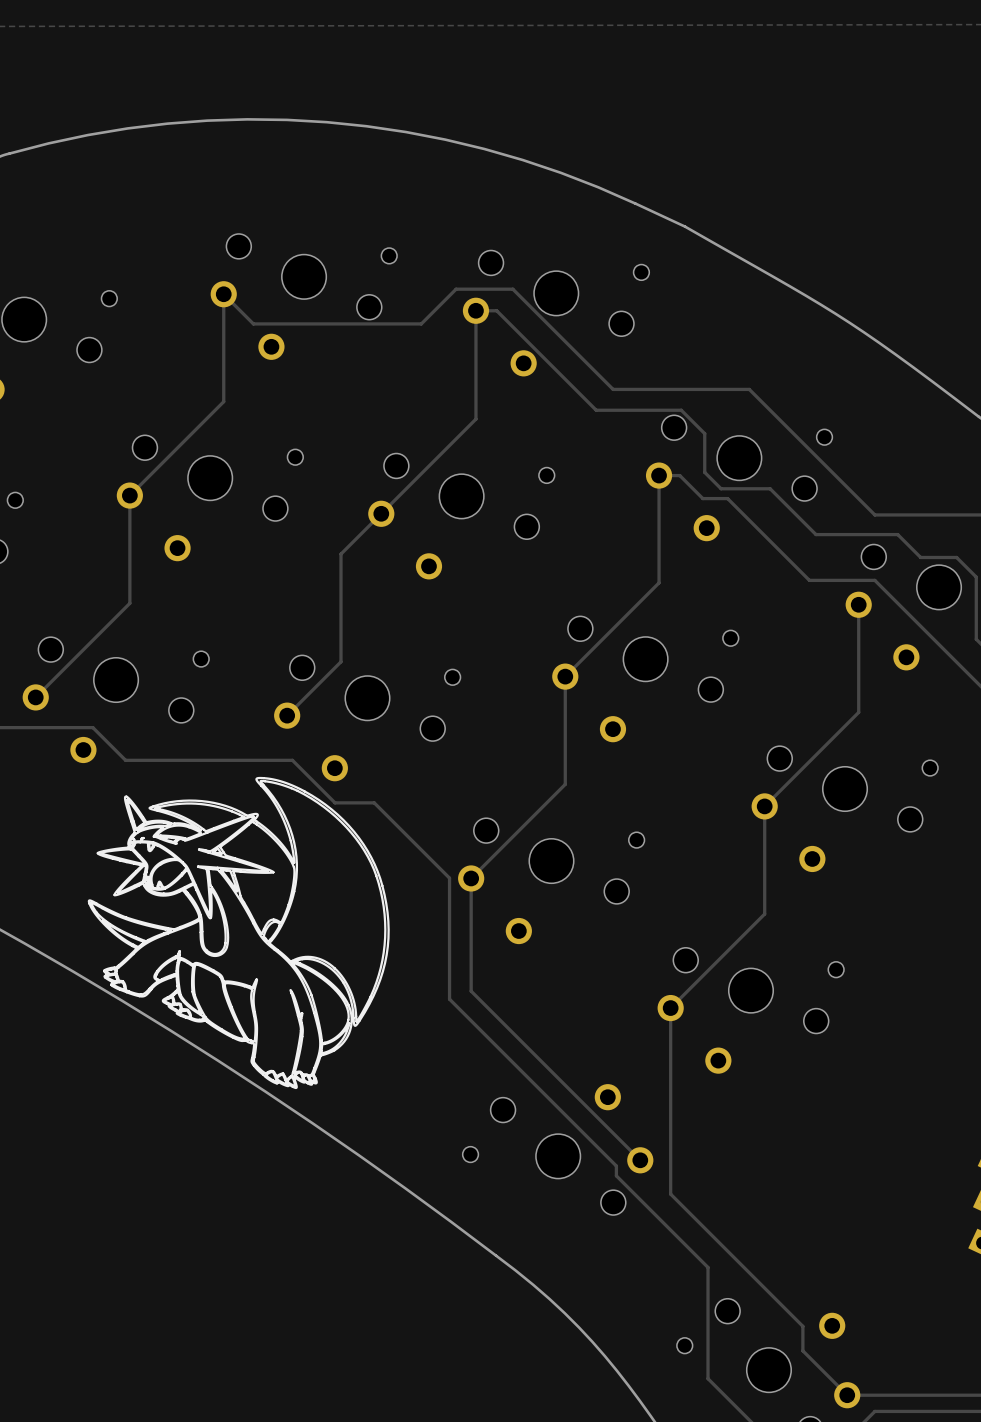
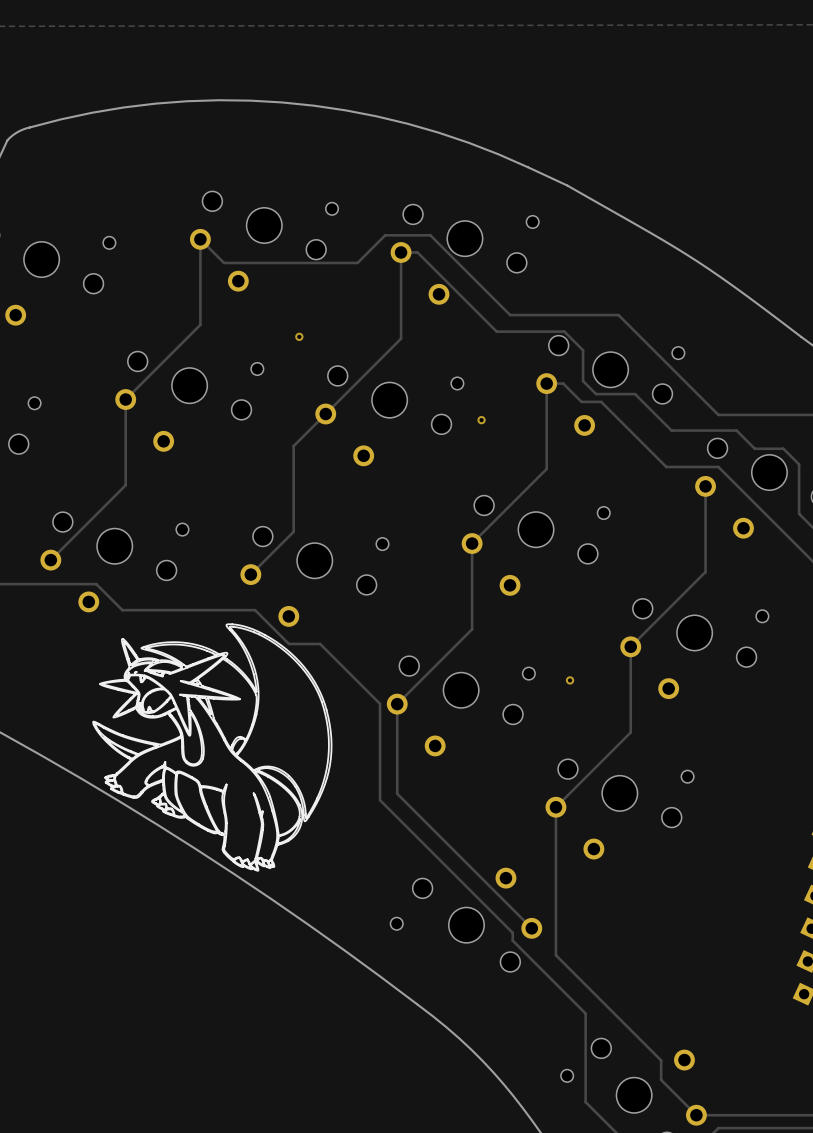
via: none -> (299, 336)
via: none -> (481, 420)
via: none -> (570, 680)

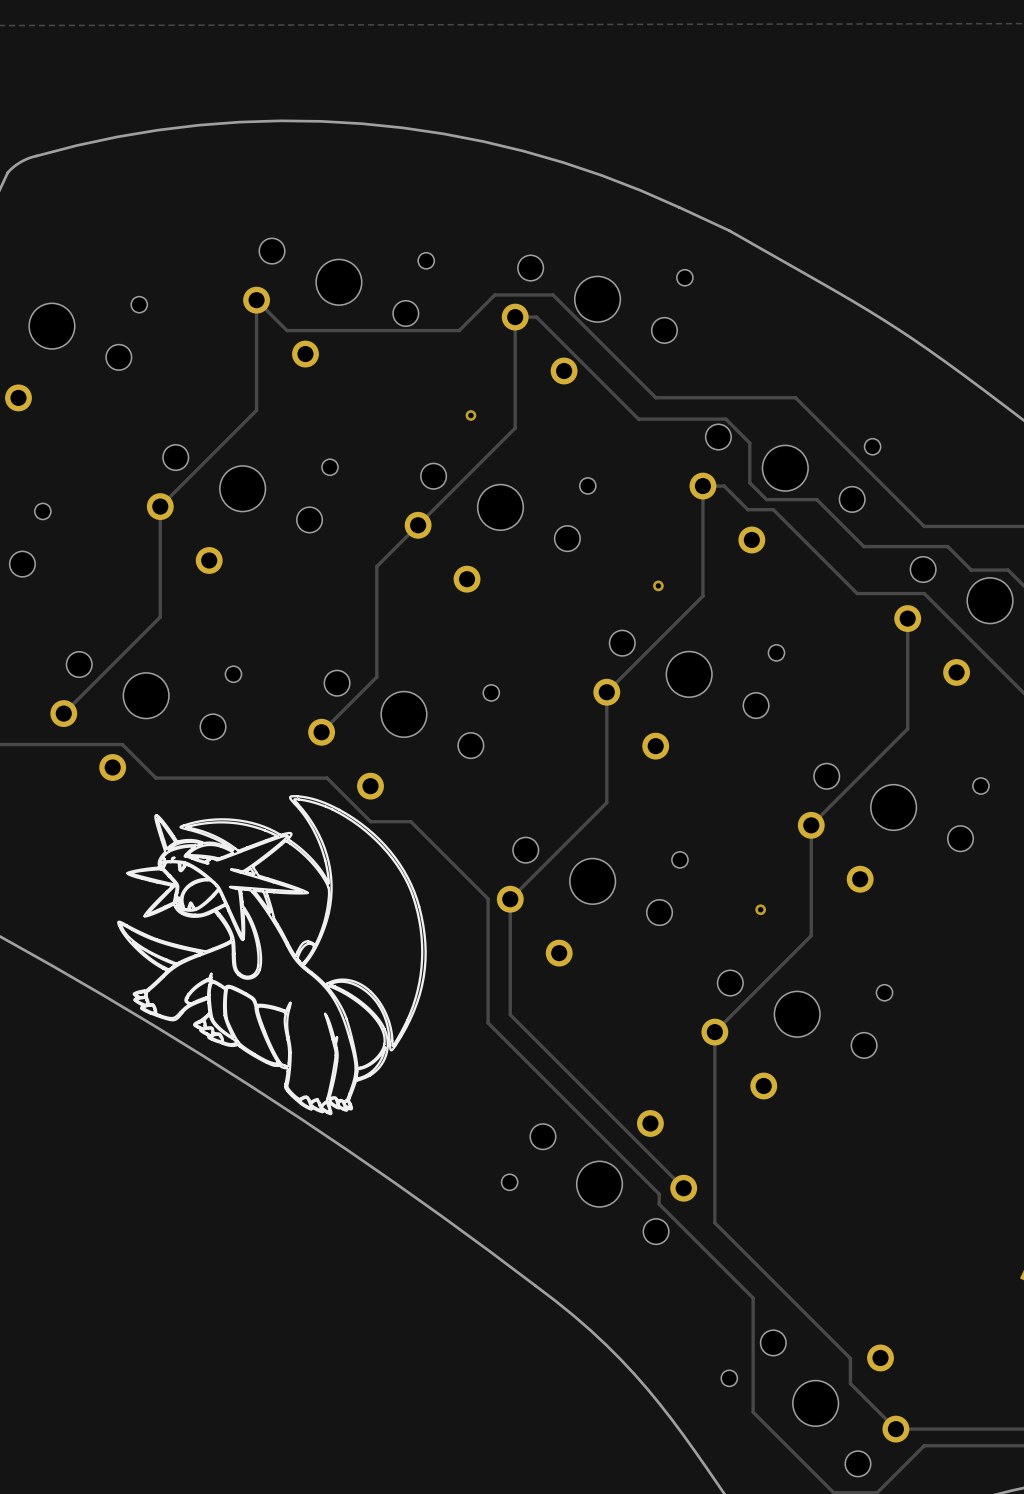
via: none -> (470, 415)
via: (299, 336) -> none
via position: (481, 420) -> (658, 585)
via position: (570, 680) -> (760, 909)

